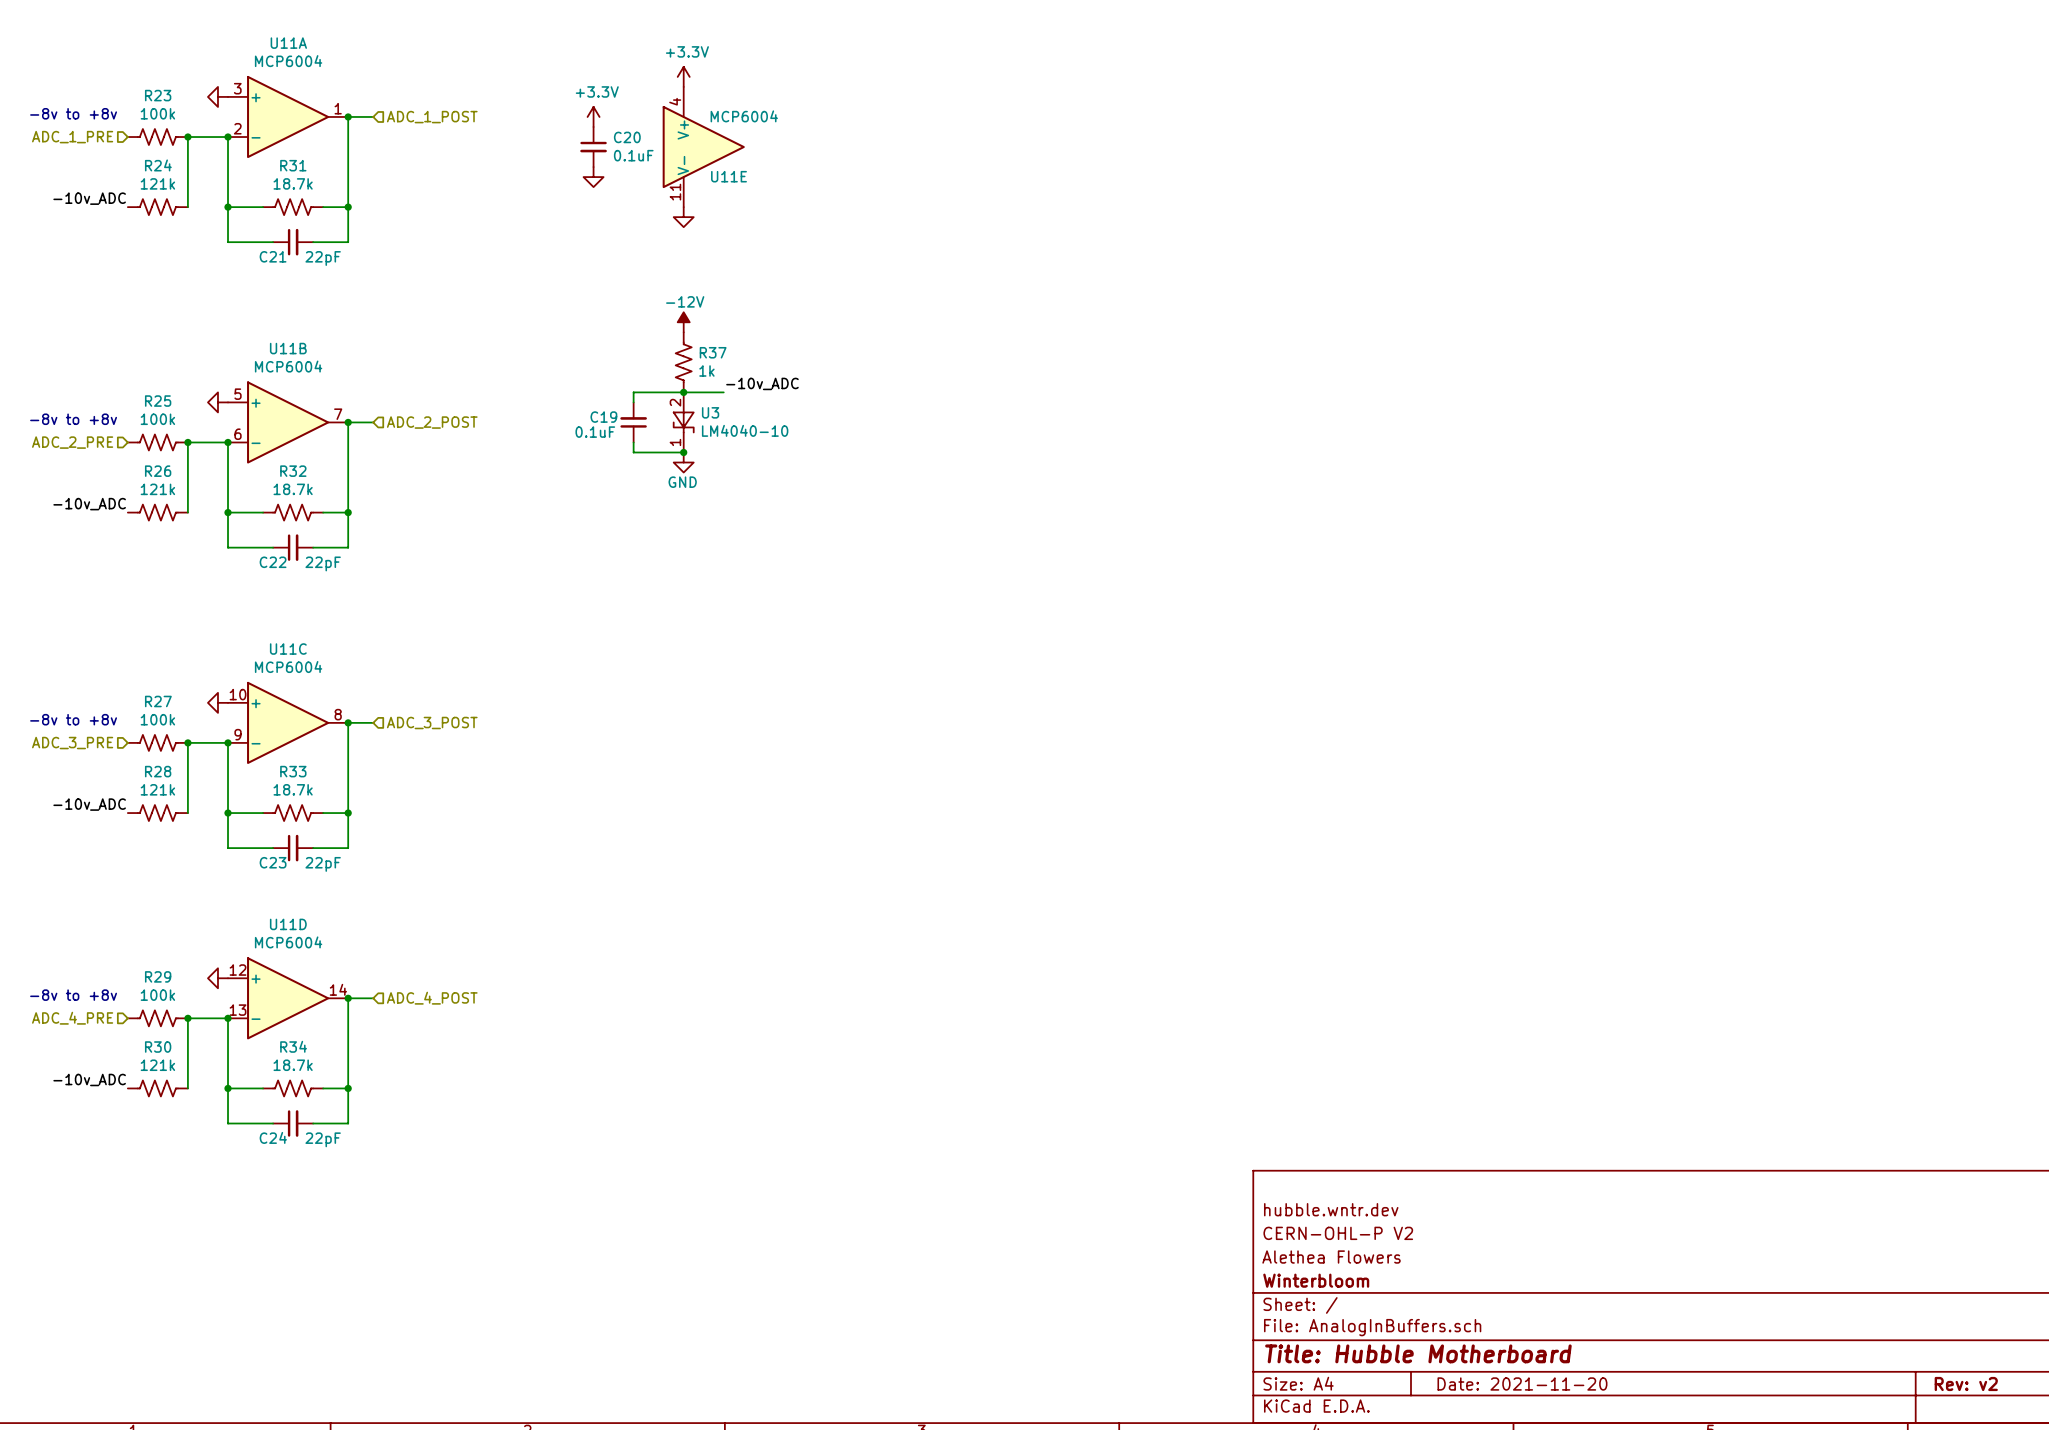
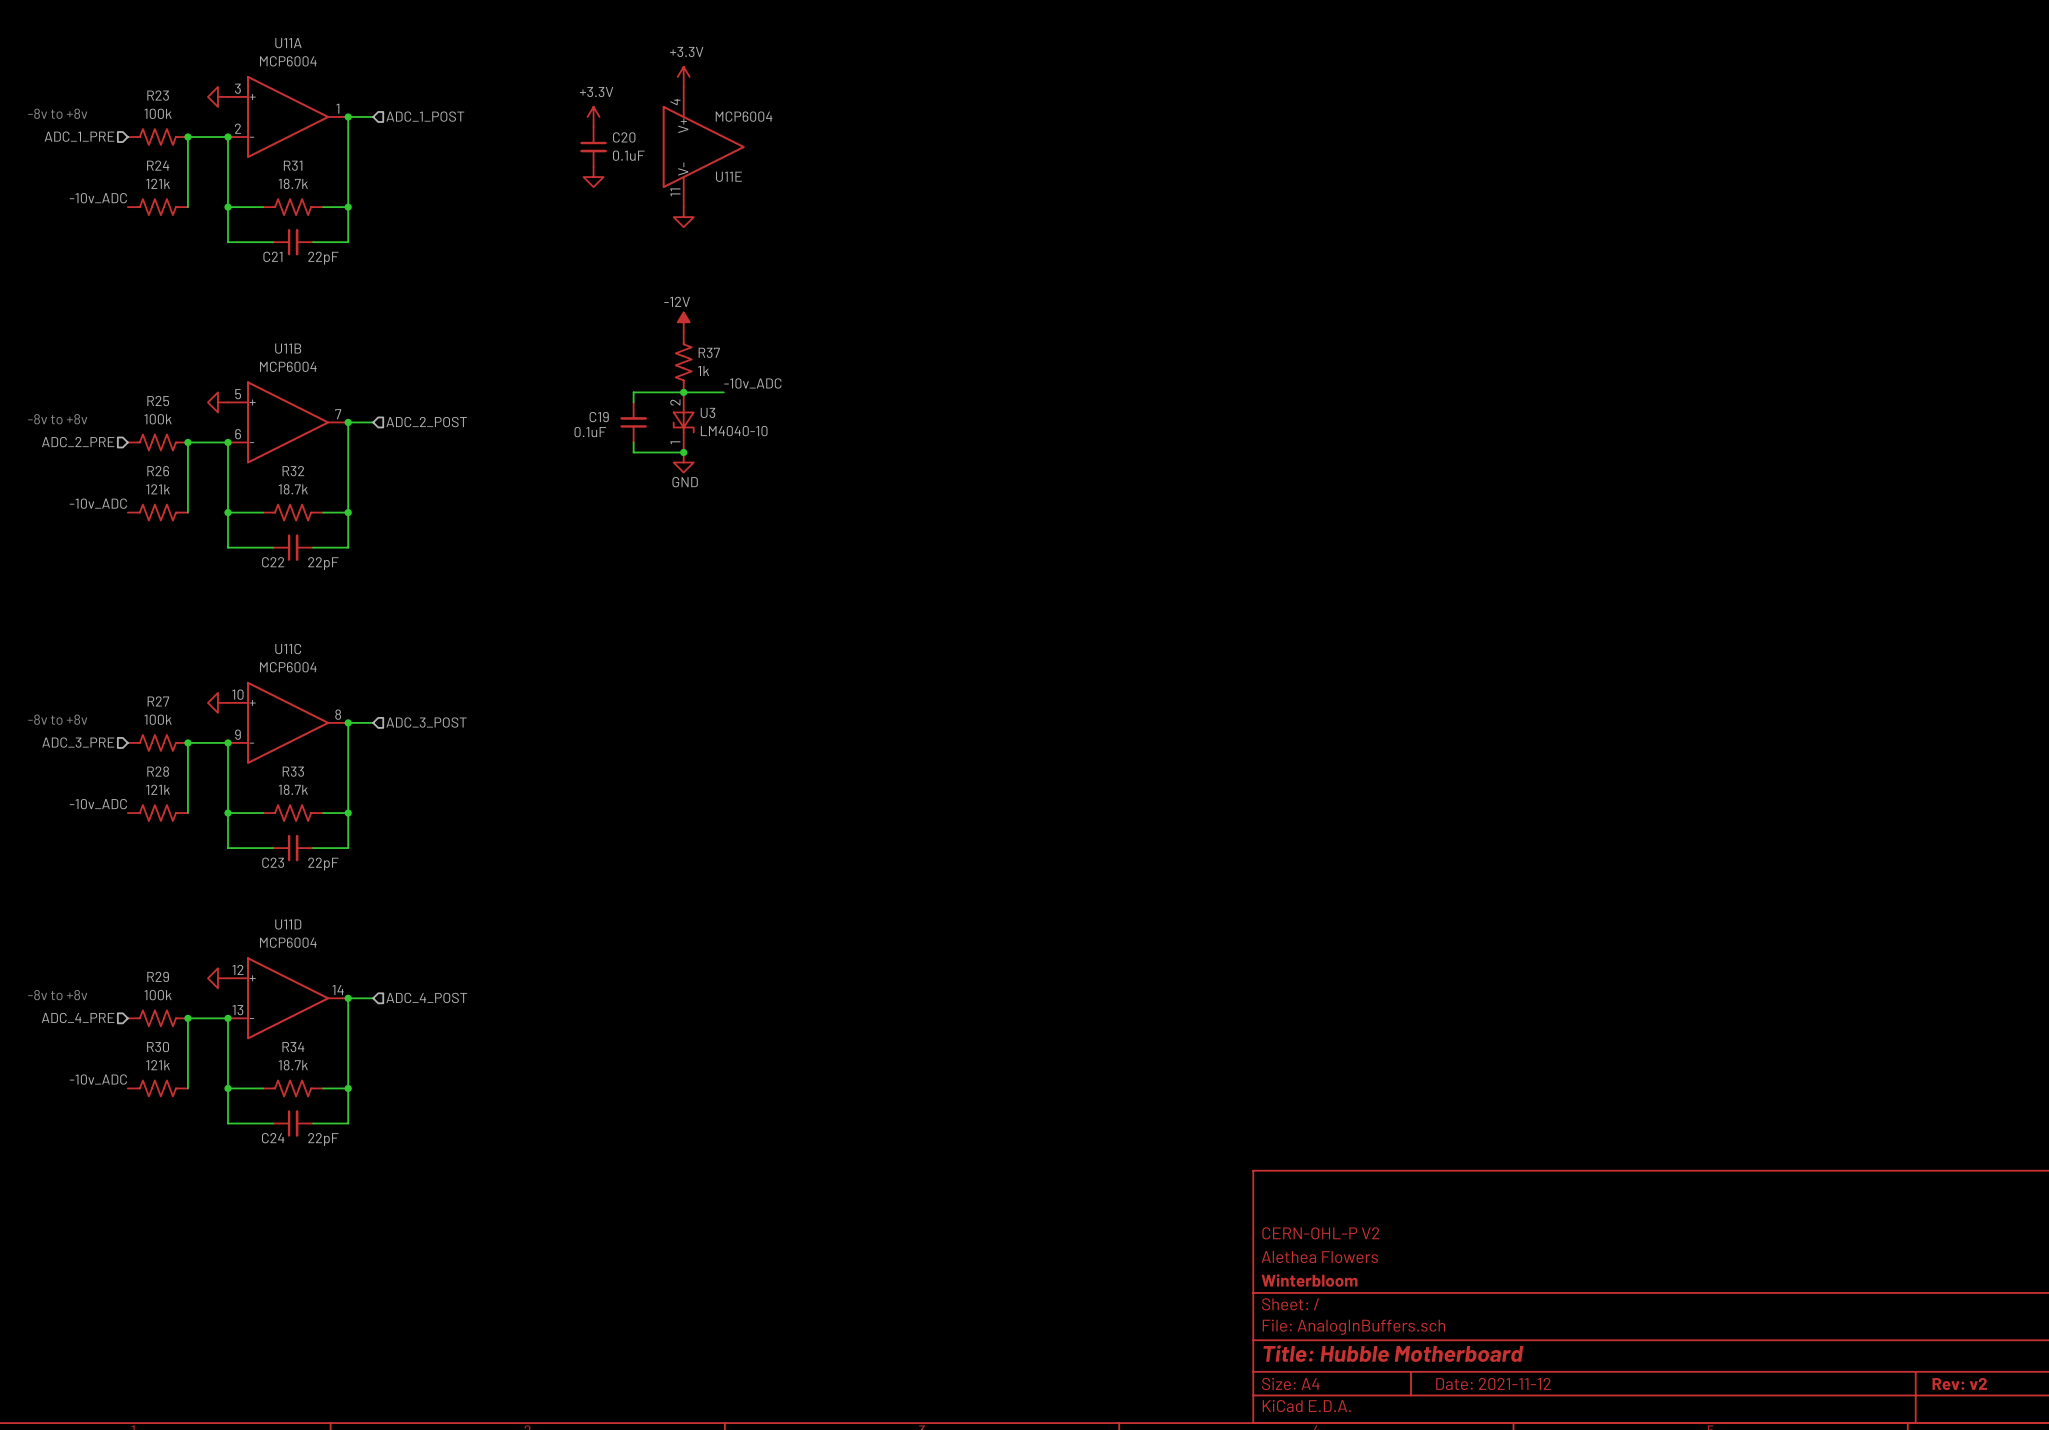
title block: hubble.wntr.dev (1331, 1209) -> none
title block: Date: 2021-11-20 (1522, 1383) -> Date: 2021-11-12 (1493, 1384)

